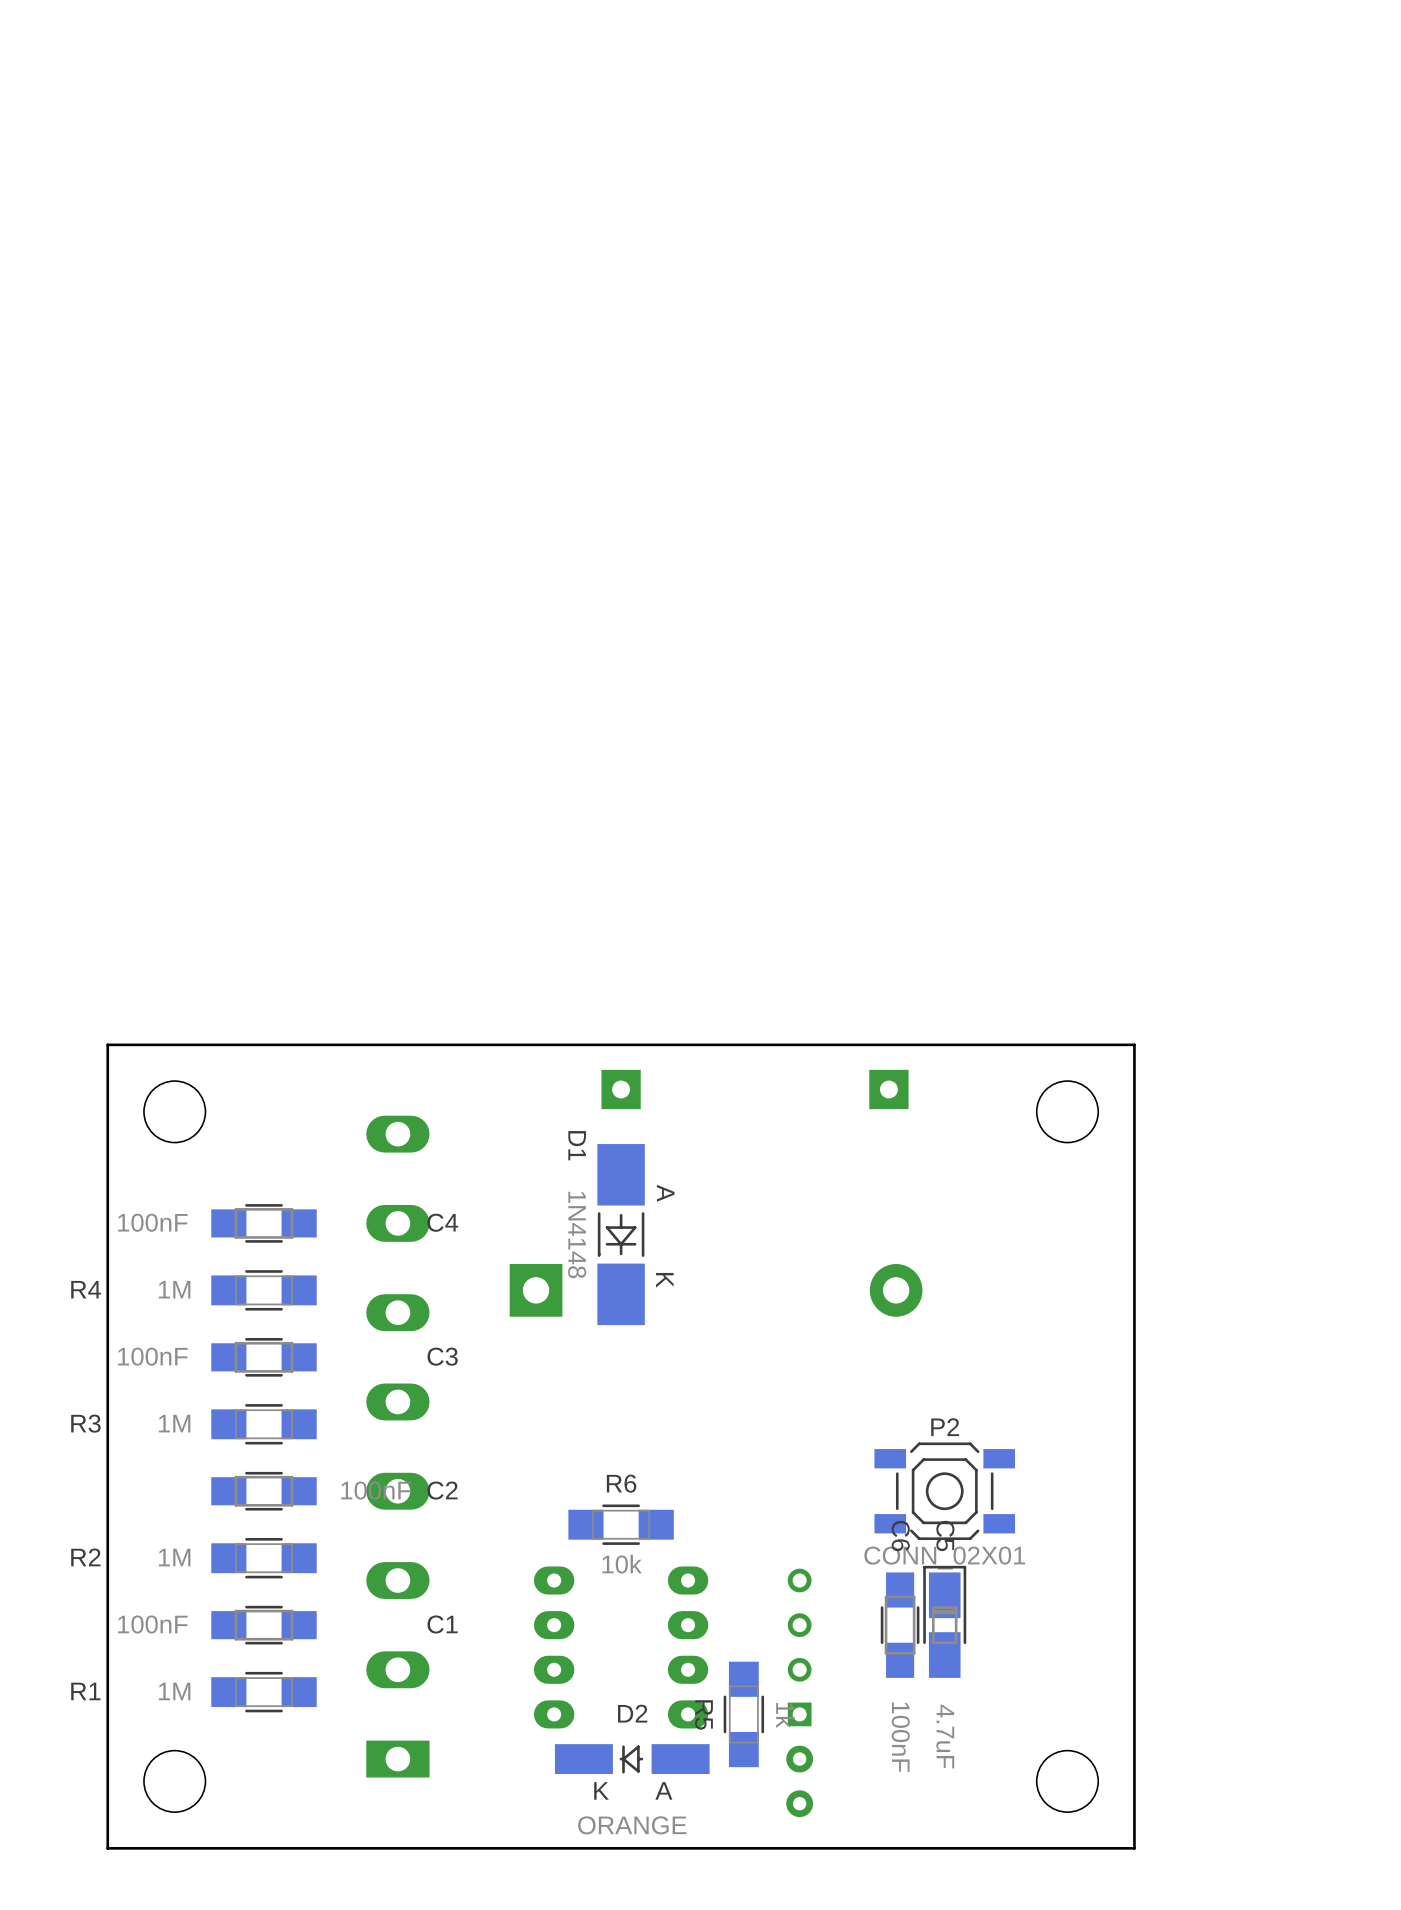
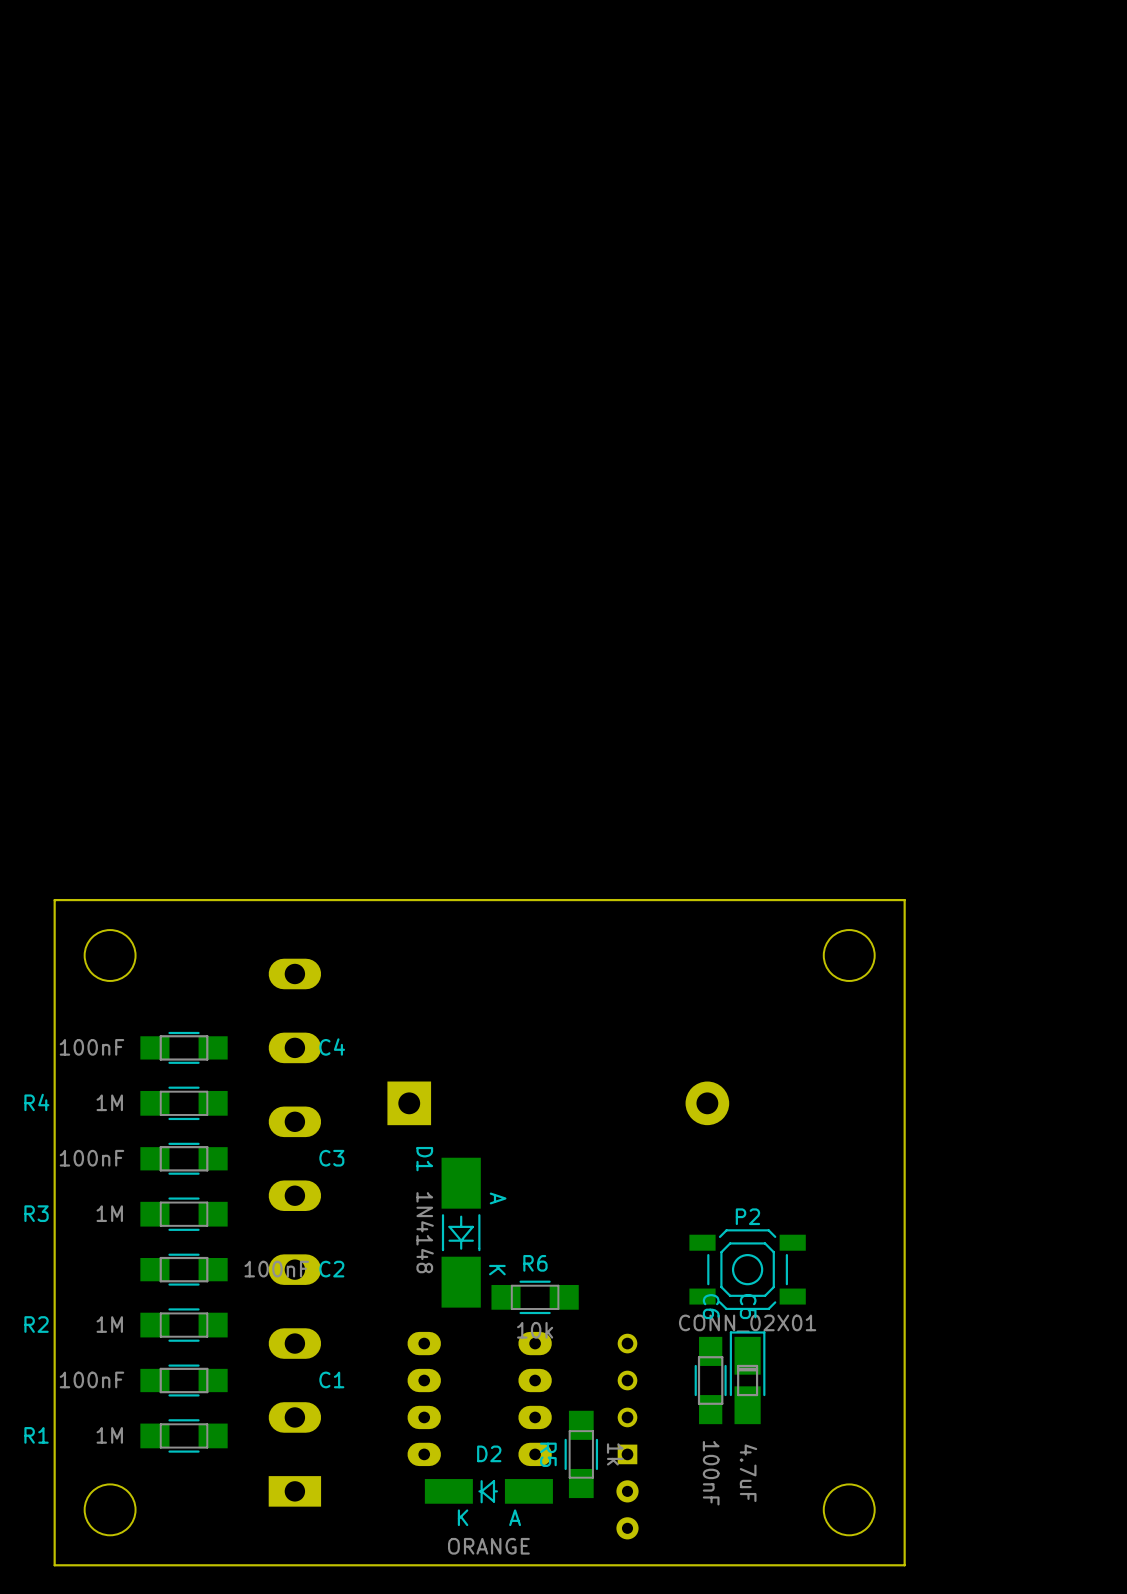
part: (621, 1089) -> none
part: (888, 1089) -> none
D1 position: (621, 1234) -> (461, 1232)
R6 position: (621, 1524) -> (535, 1297)

